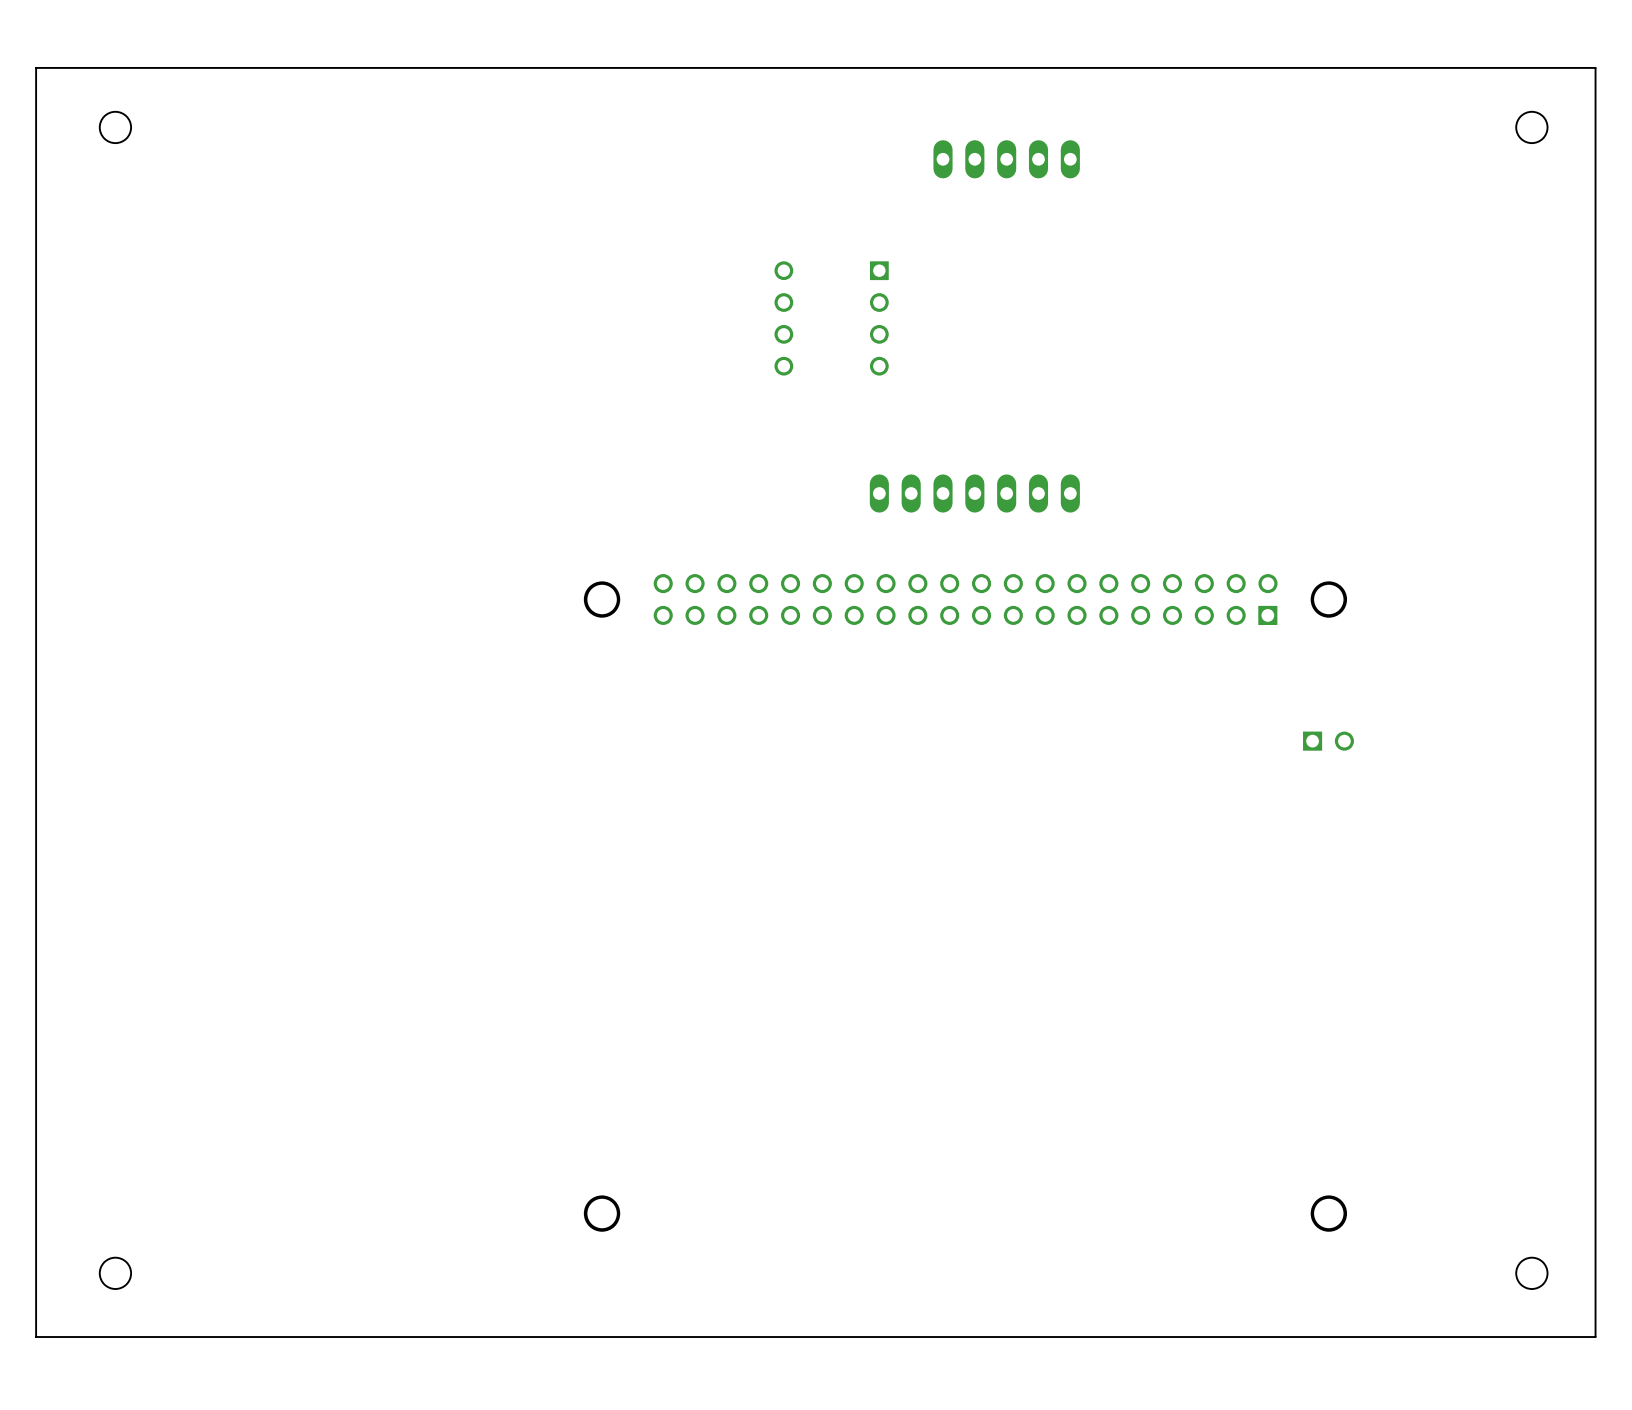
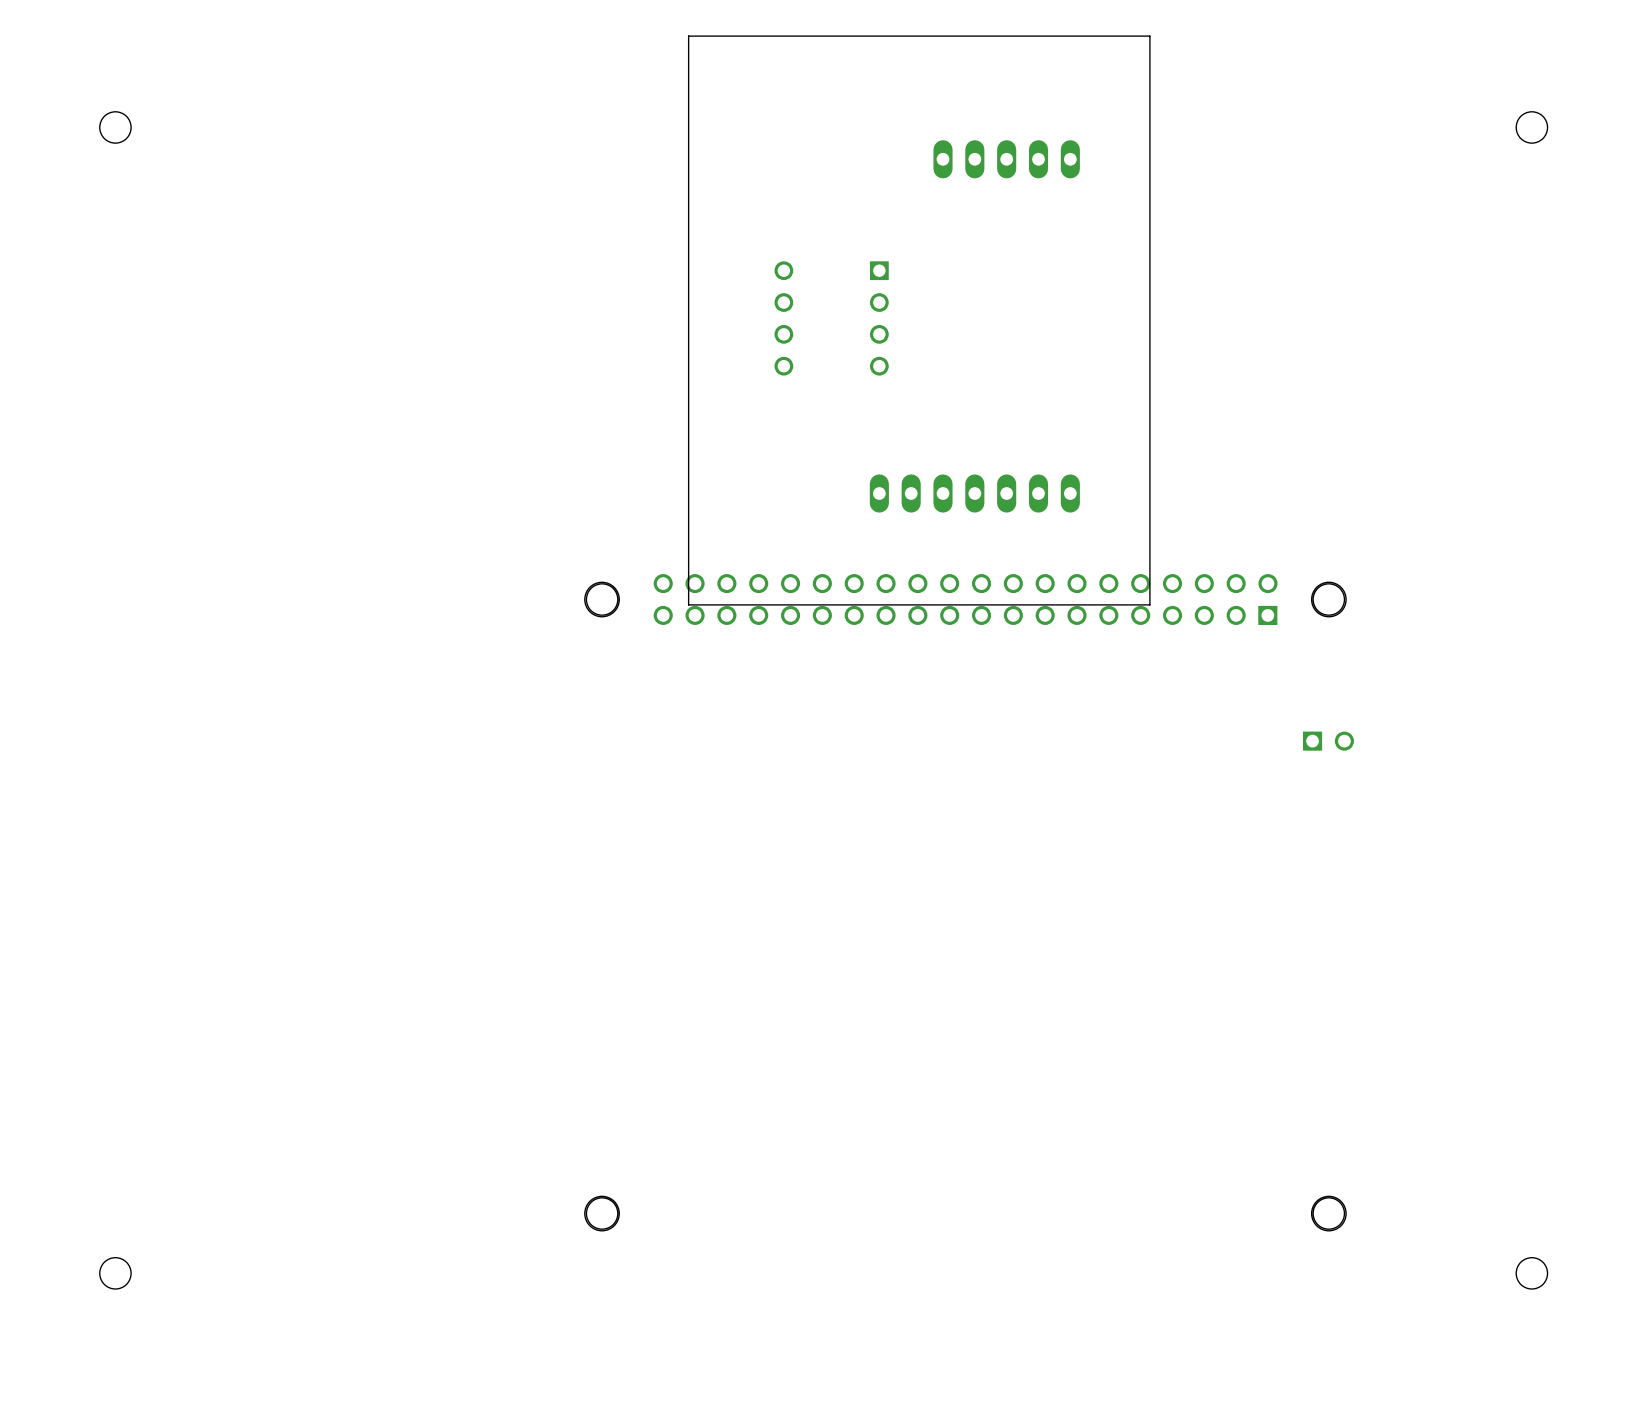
board edge: none -> (1149, 36) (688, 36) (688, 604) (1149, 604) (1149, 36)
board edge: (1595, 67) (36, 67) (36, 1337) (1595, 1337) (1595, 67) -> none

